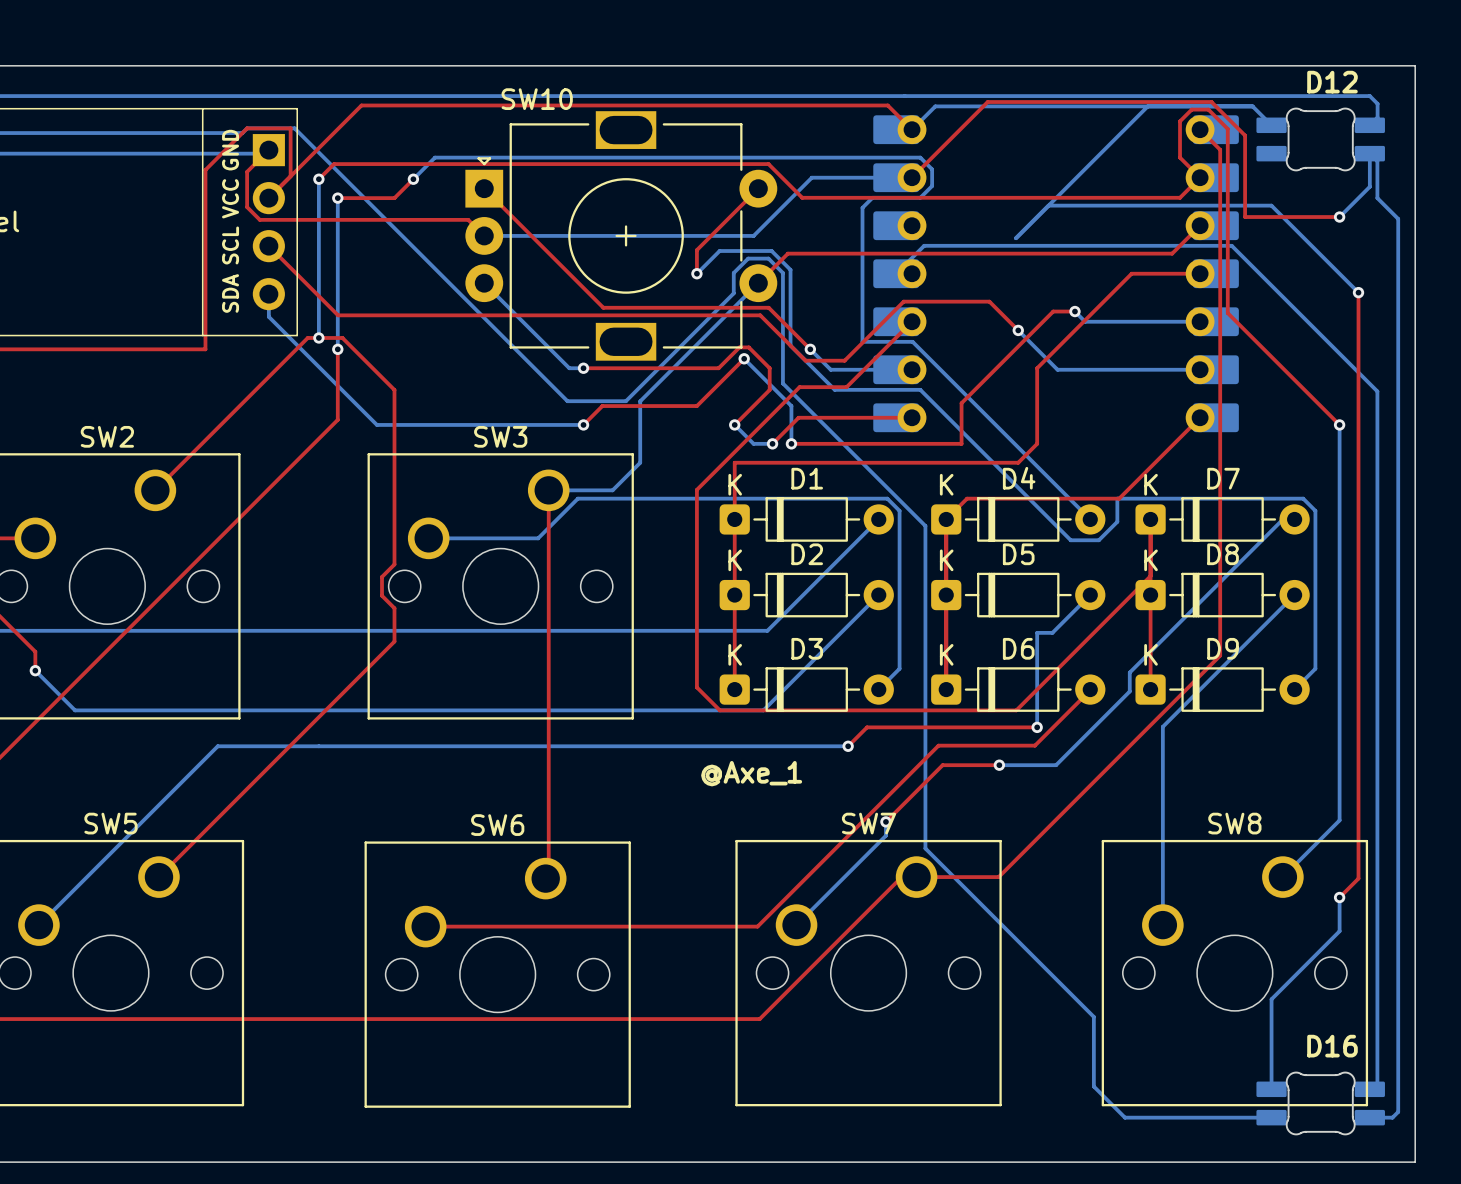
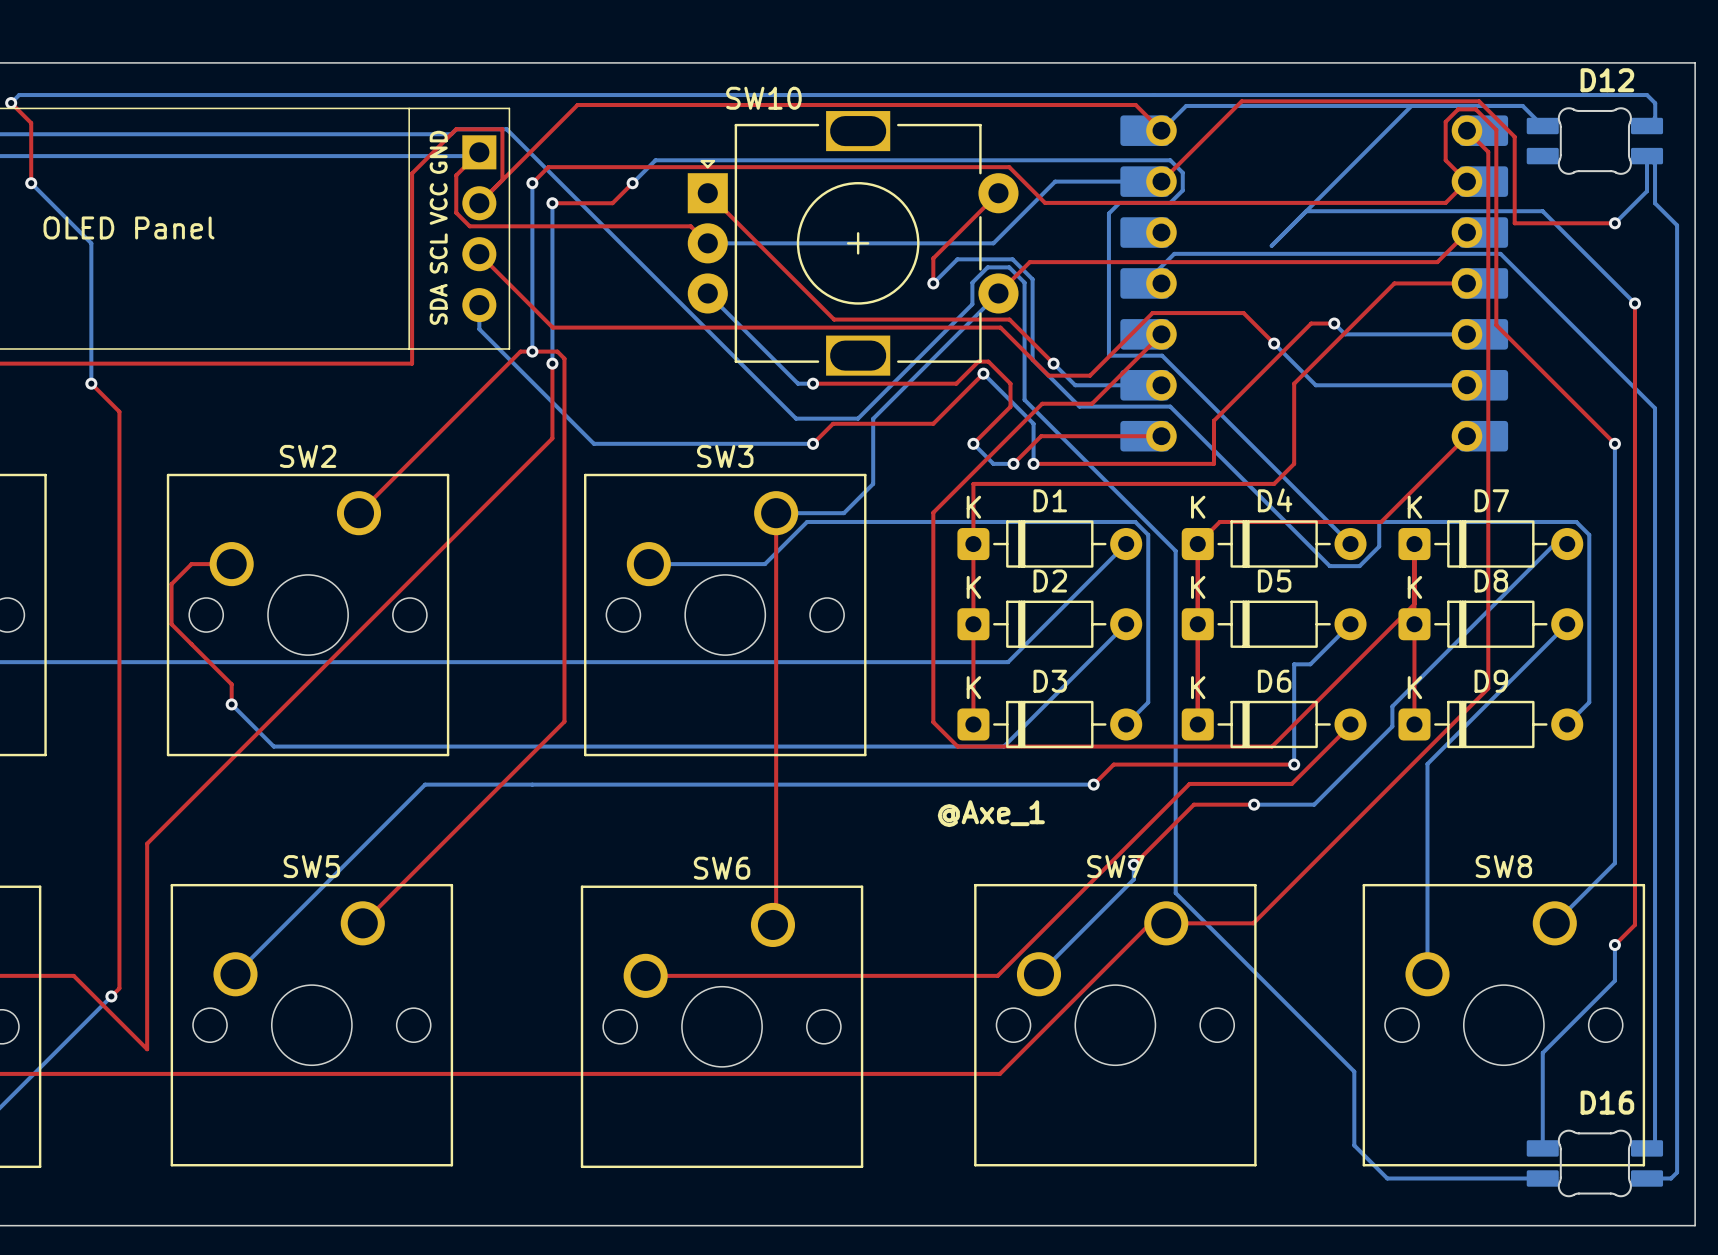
top track: (349, 344) (394, 389) (394, 564) (382, 576) (382, 595) (394, 608) (394, 641) (349, 686) -> (564, 358) (564, 721)

